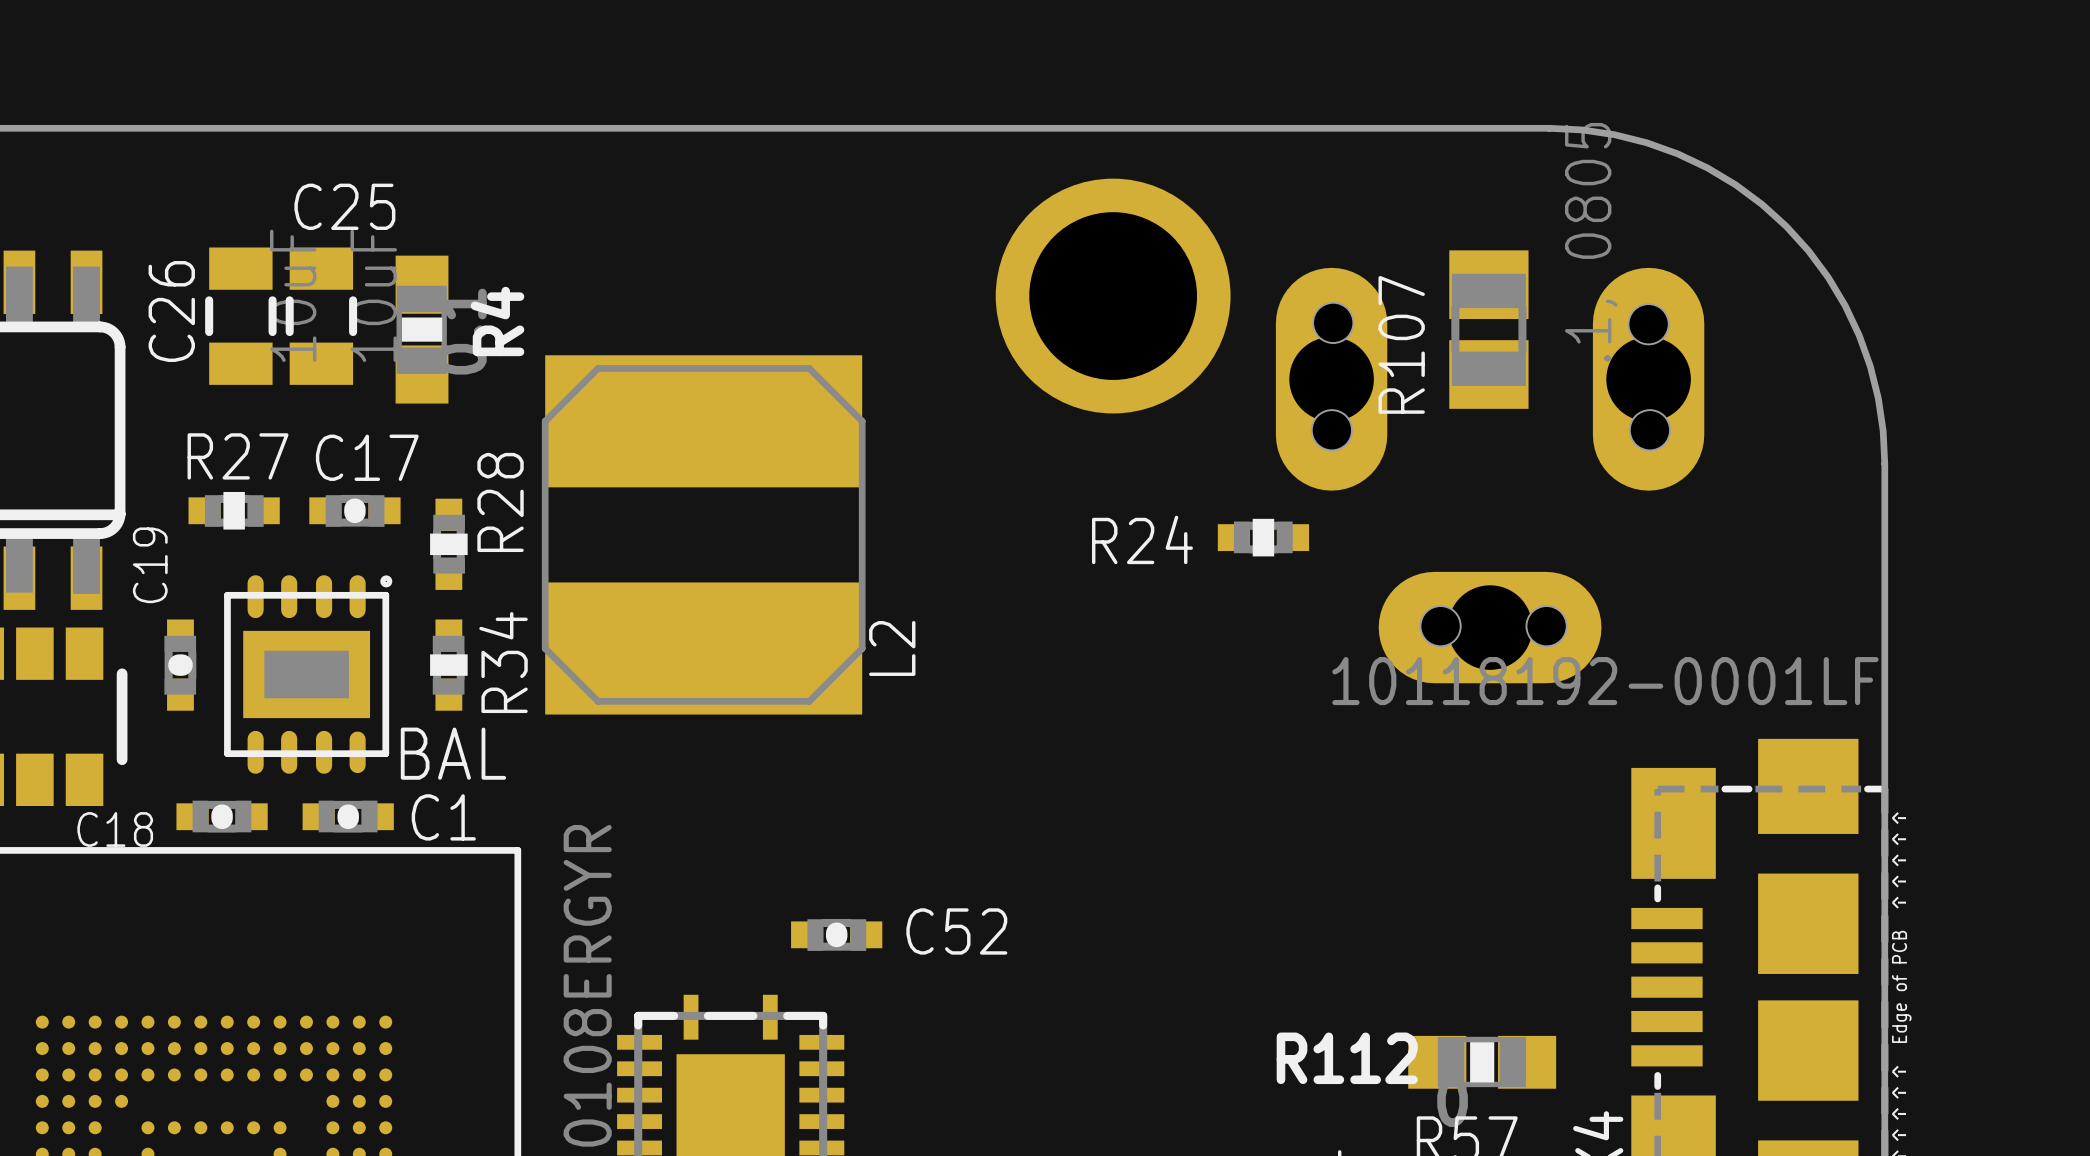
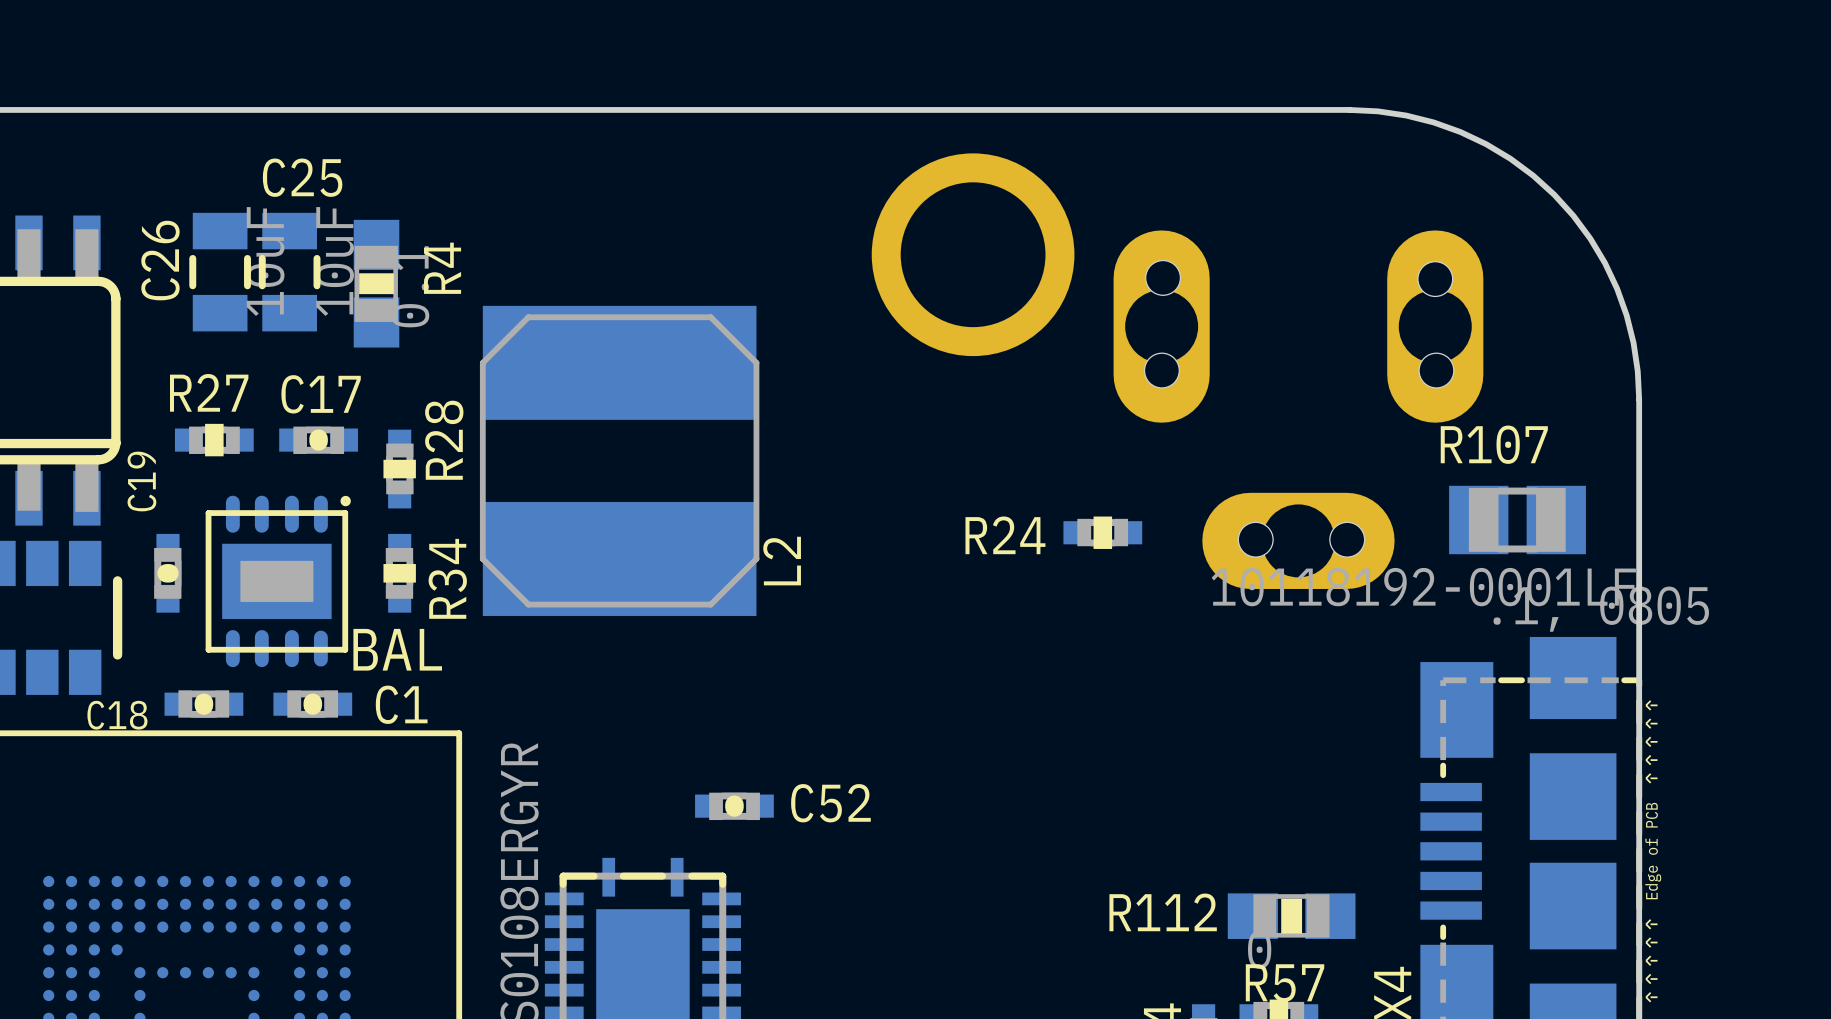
R107 rotation: 0° (1488, 329) -> 90° clockwise (1517, 520)
R107 position: (1488, 329) -> (1517, 520)
R24 position: (1263, 537) -> (1102, 532)

